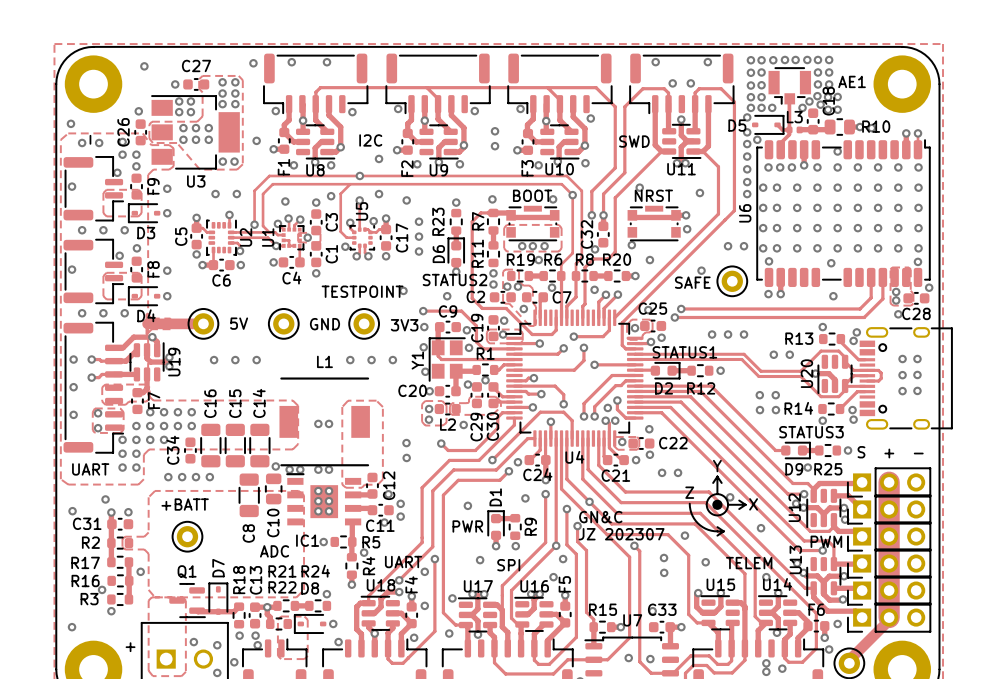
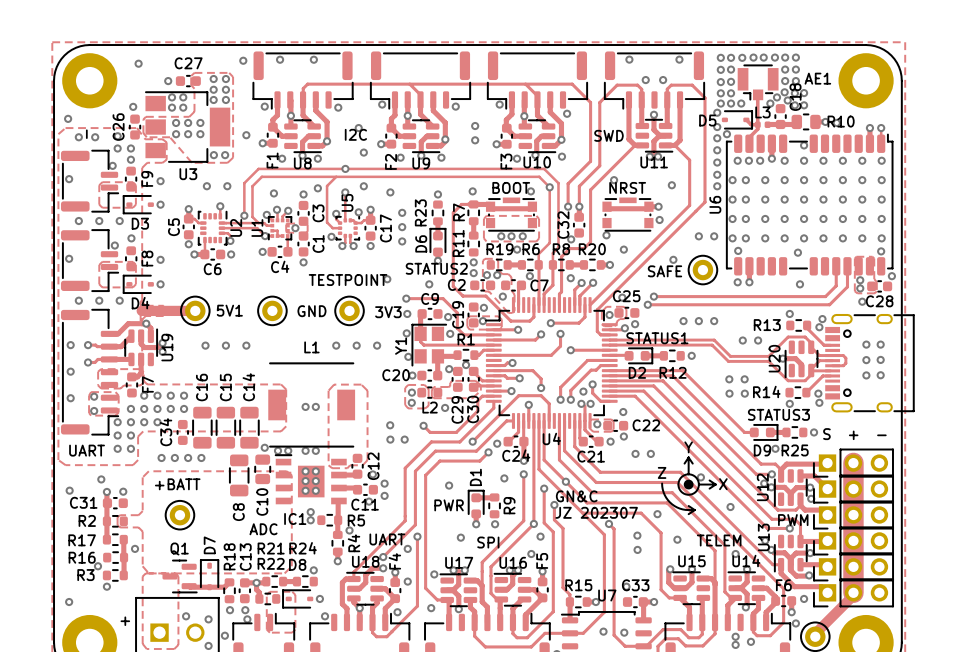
via: none -> (358, 128)
text: 5V (239, 323) -> 5V1 (229, 310)
via: none -> (404, 439)
via: none -> (310, 512)

